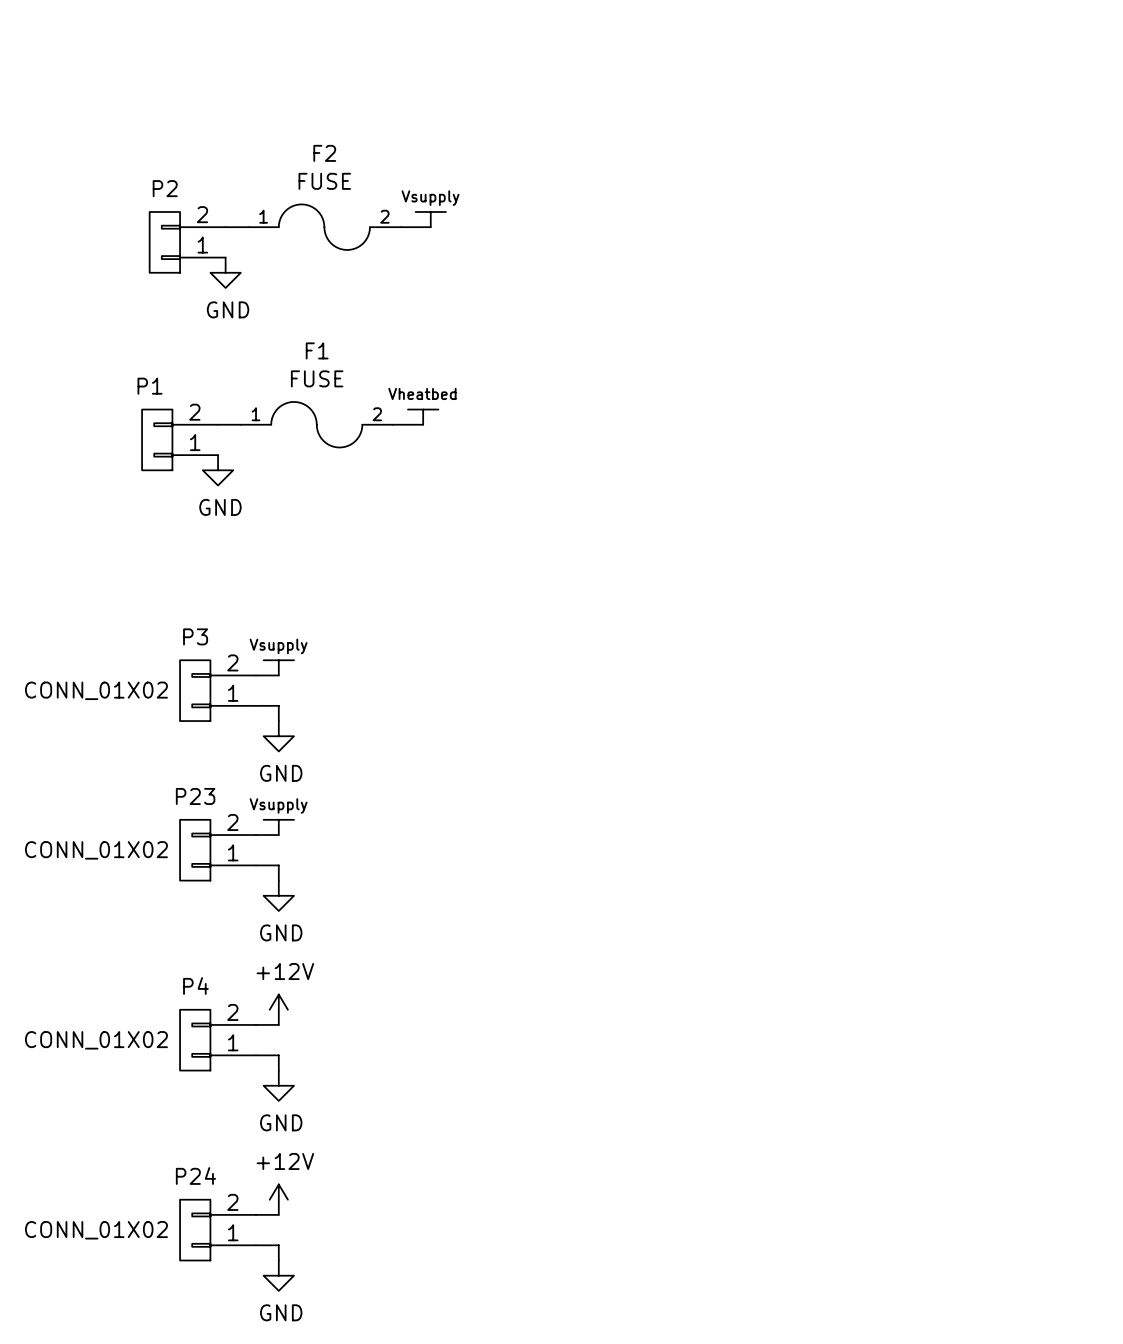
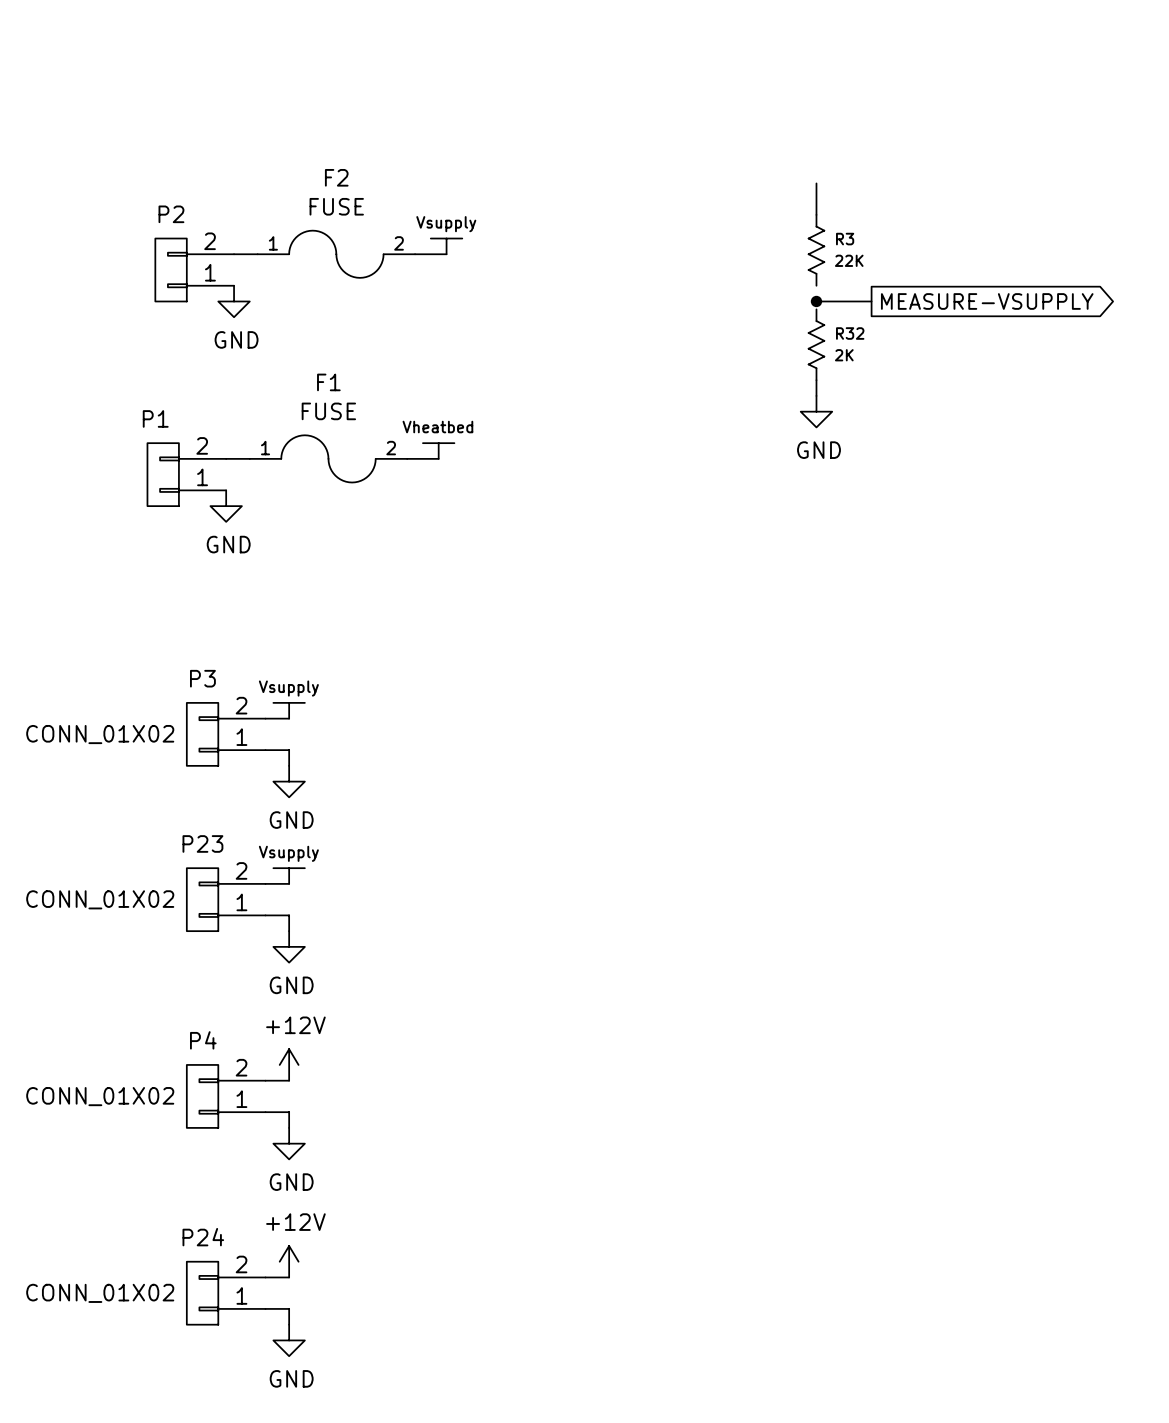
wire: none -> (816, 183) (816, 214)
R3: none -> 22K (816, 250)
wire: none -> (816, 301) (871, 301)
junction: none -> (816, 301)
global label: none -> MEASURE-VSUPPLY (987, 301)
R32: none -> 2K (816, 344)
wire: none -> (816, 380) (816, 395)
power symbol: none -> GND (816, 411)

